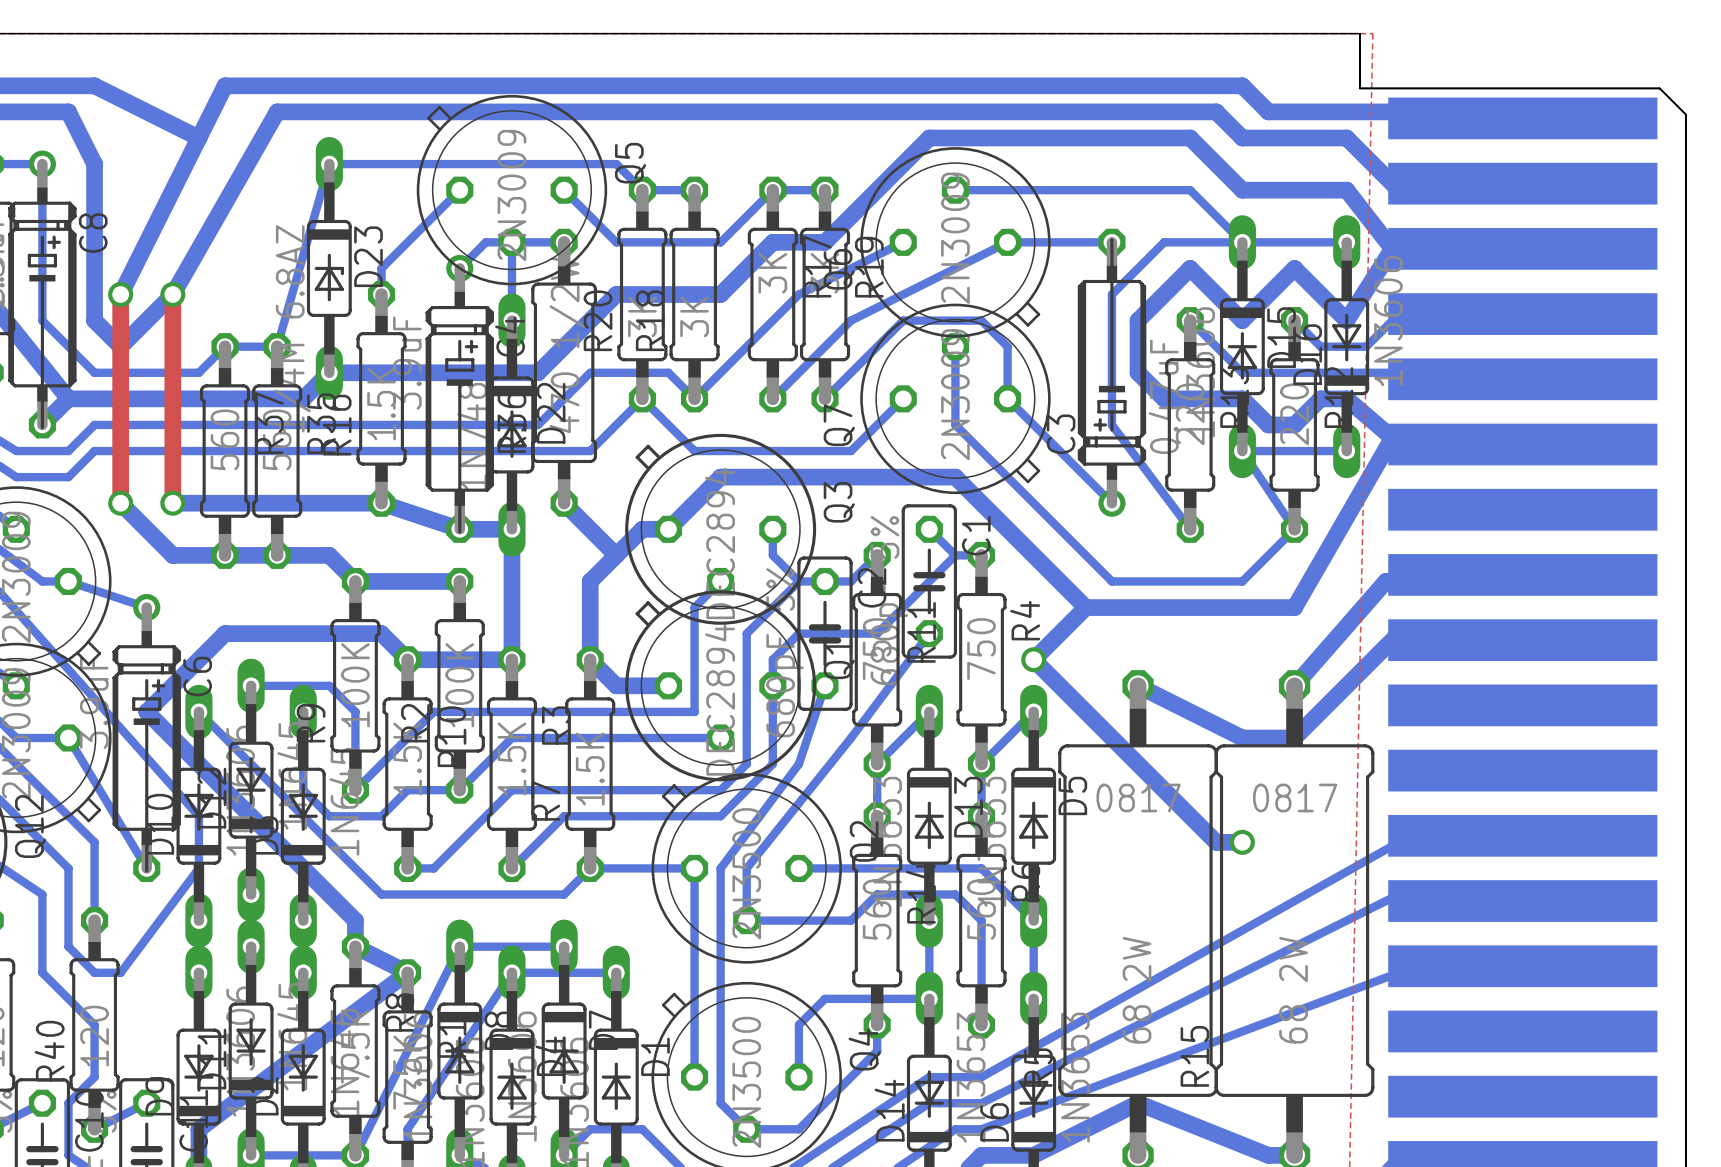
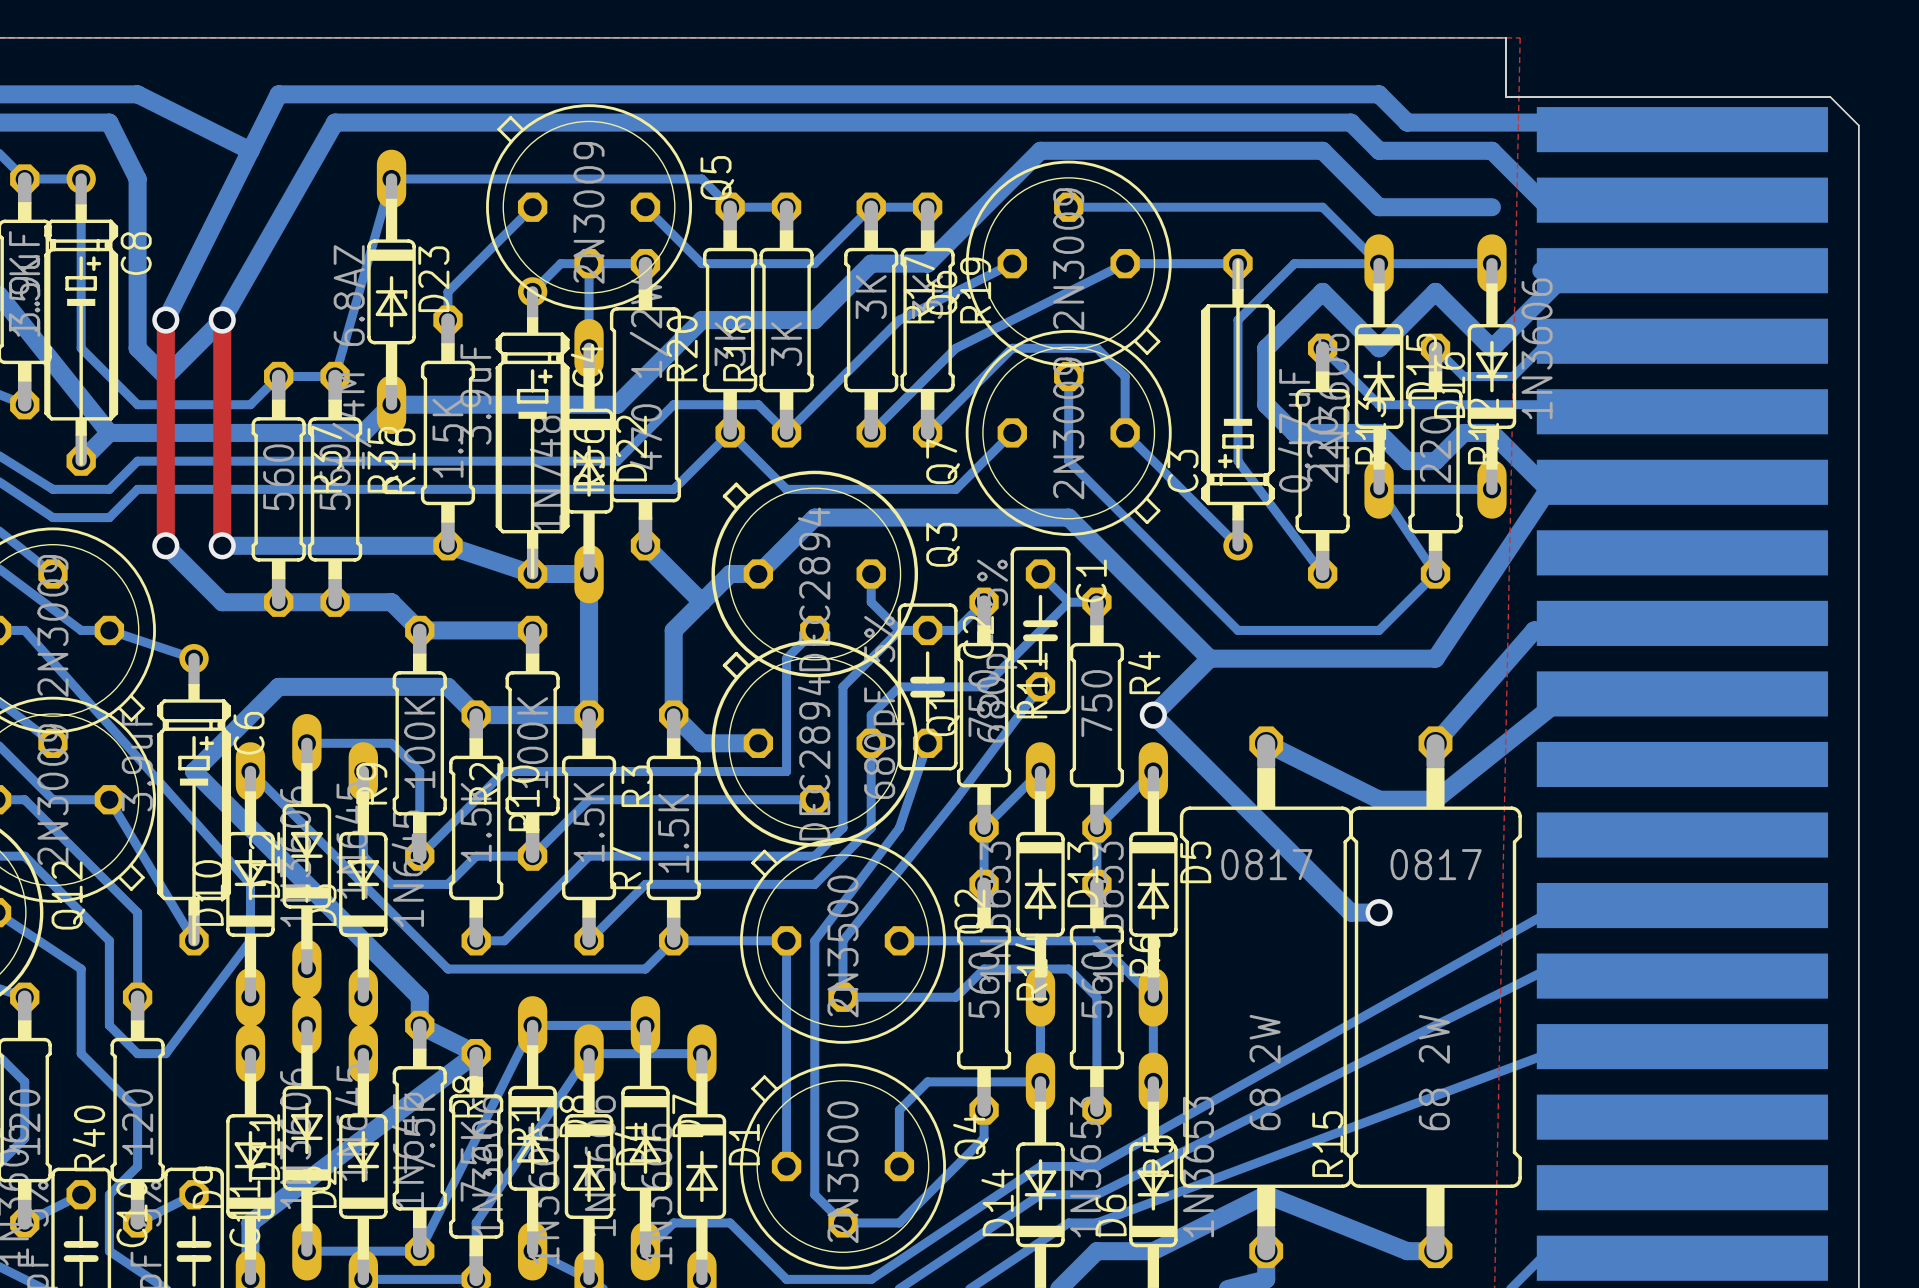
bottom track: (1346, 190) (1392, 248) (1346, 320) -> (1576, 263) (1491, 348)
bottom track: (1346, 398) (1392, 437) -> (1491, 432) (1548, 489)
bottom track: (1392, 437) (1294, 607) -> (1548, 489) (1435, 658)
bottom track: (1424, 633) (1398, 633) (1294, 737) -> (1576, 686) (1435, 799)

